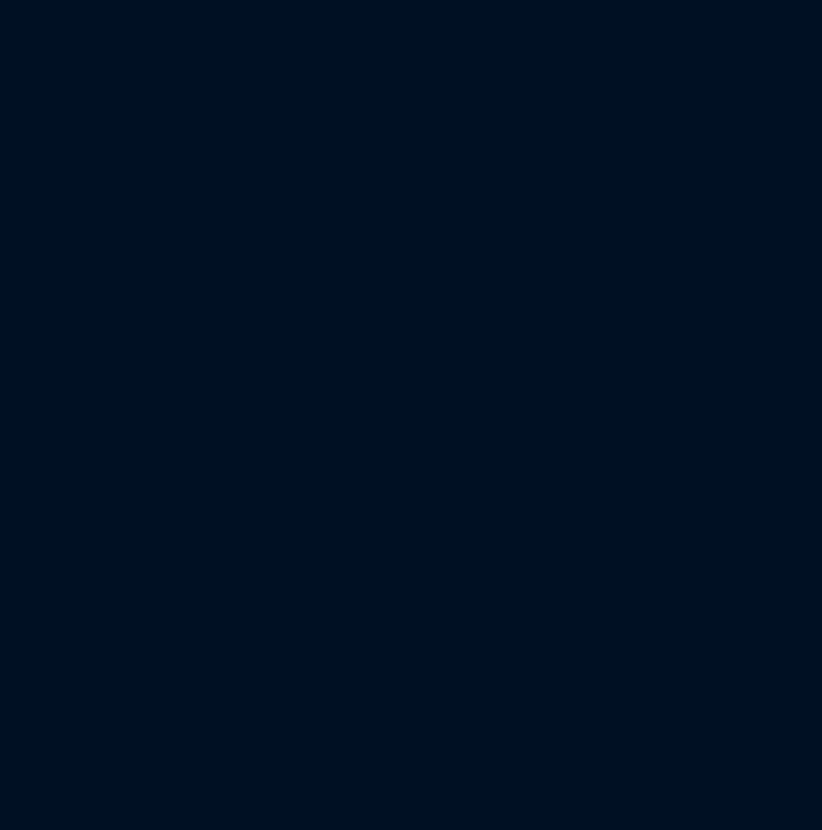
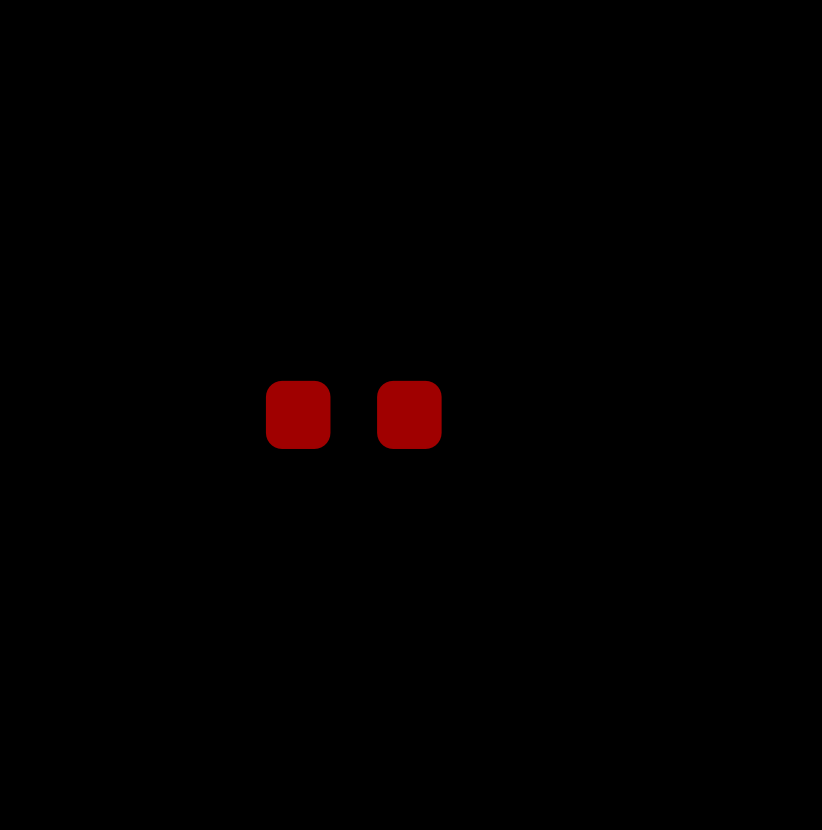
part: none -> (353, 414)

